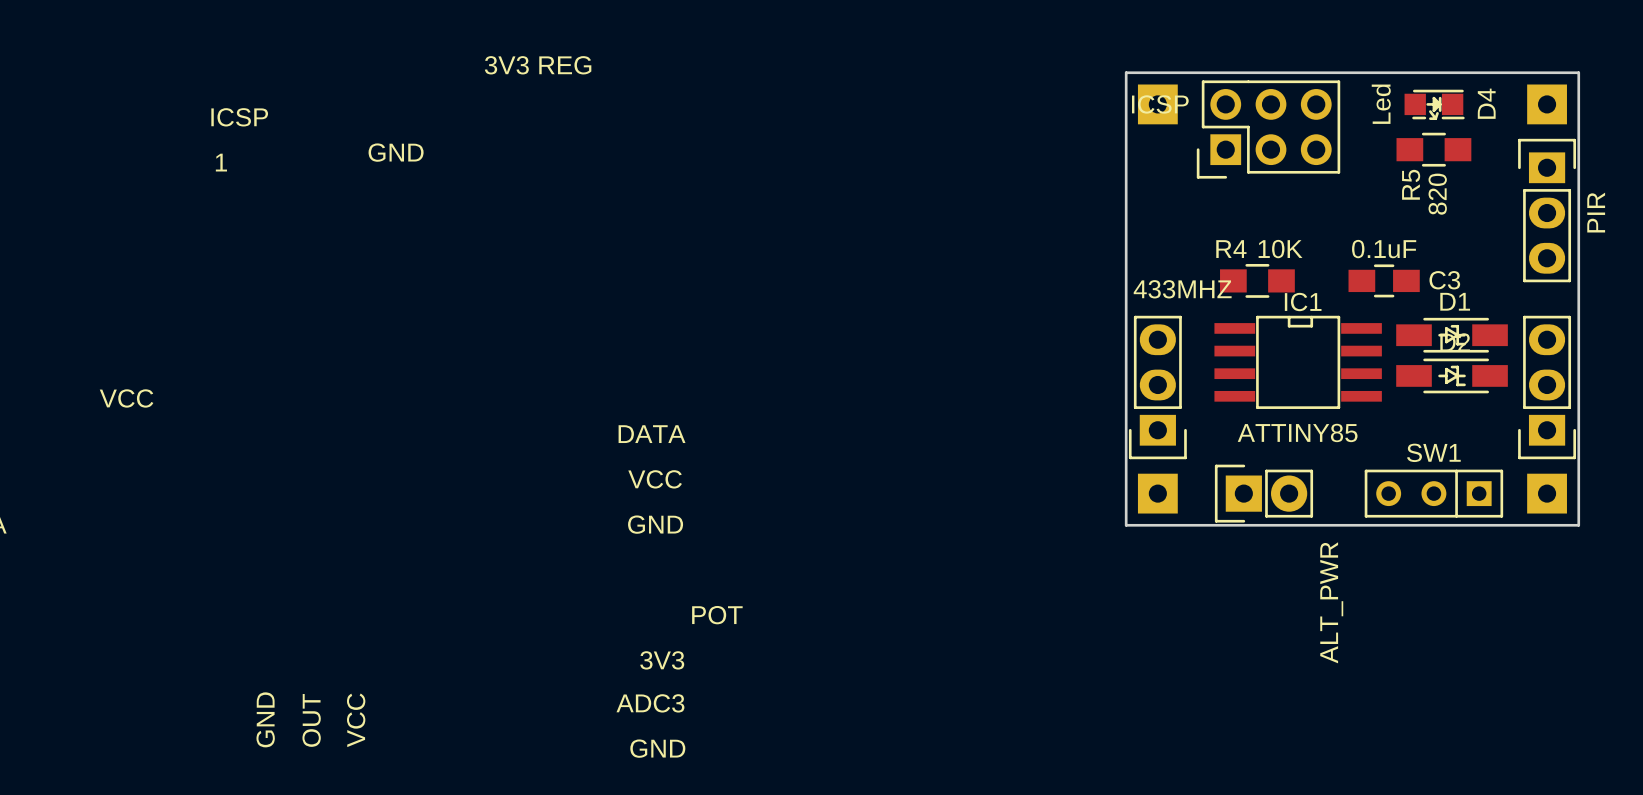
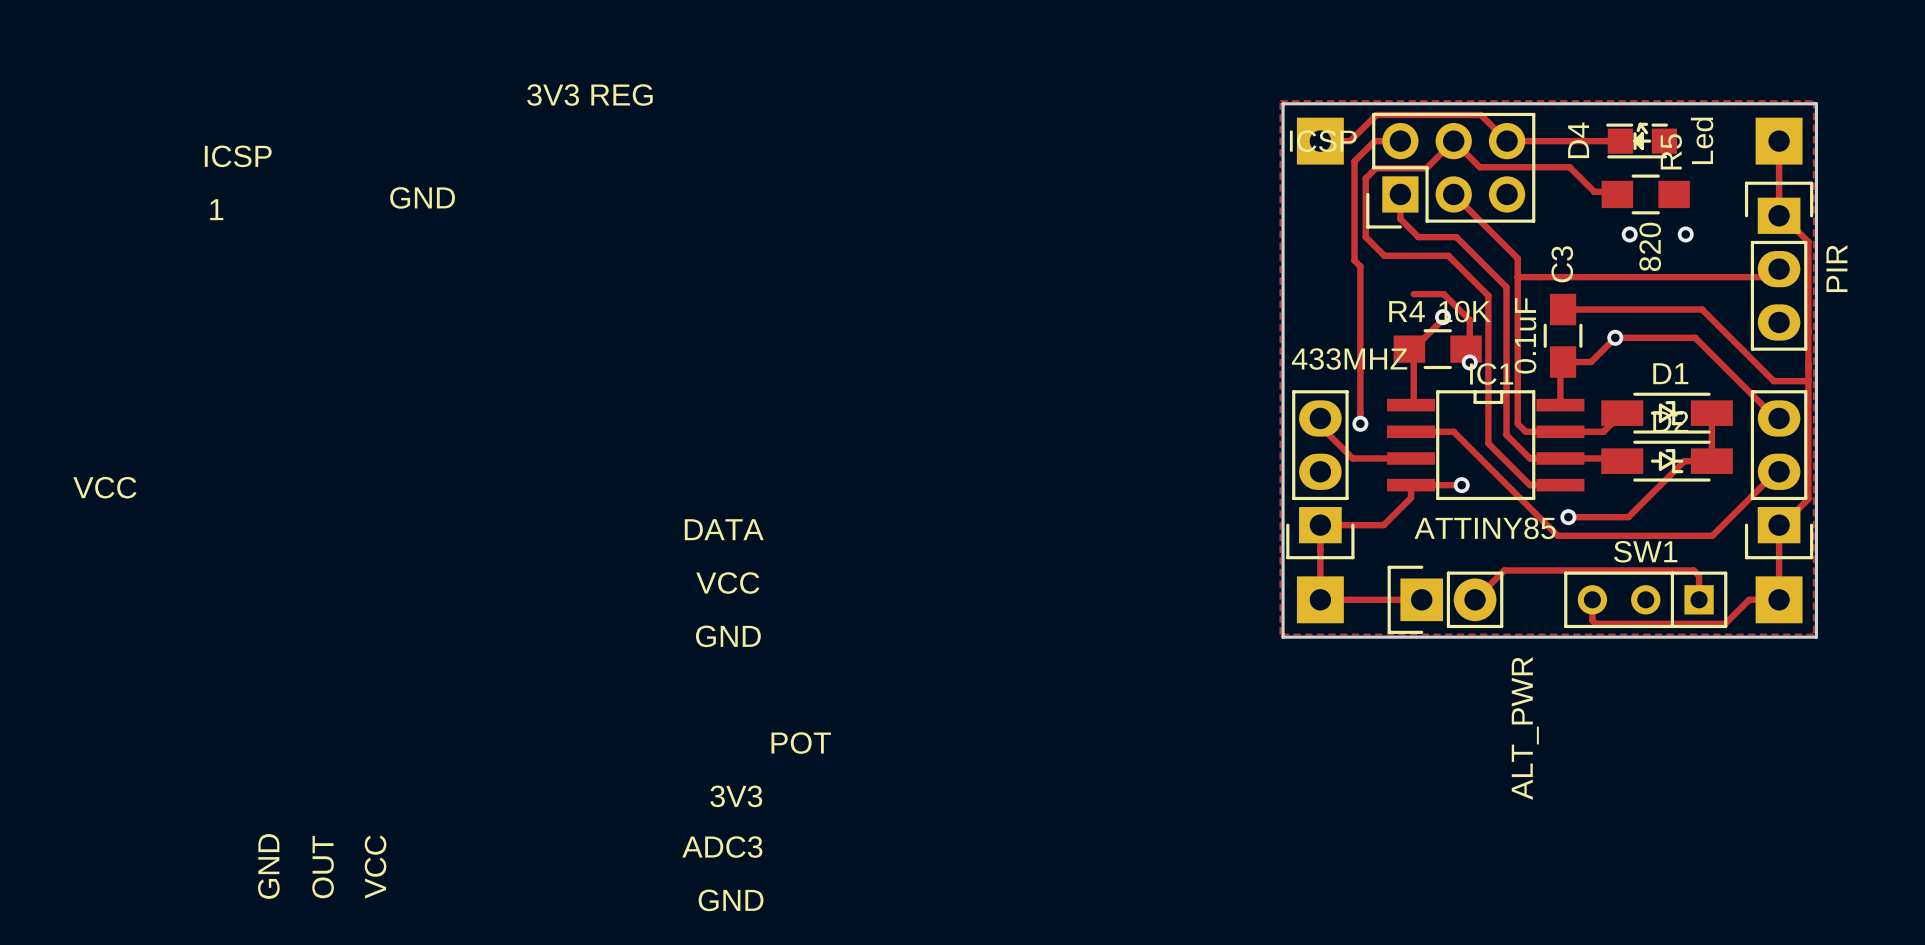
zone outline: none -> (1280, 101) (1280, 634) (1813, 634) (1813, 101) (1280, 101)
track: none -> (1320, 141) (1350, 141) (1376, 114) (1480, 114) (1507, 141) (1620, 141)
track: none -> (1400, 141) (1374, 141) (1354, 161) (1354, 260) (1360, 266) (1360, 423)
D4 rotation: 0° (1434, 104) -> 180° (1641, 140)
track: none -> (1779, 141) (1779, 215) (1782, 215) (1808, 241) (1808, 499) (1782, 525) (1779, 525) (1779, 599) (1749, 599) (1725, 623) (1595, 623) (1592, 620) (1592, 599)
track: none -> (1616, 191) (1594, 191) (1569, 167) (1479, 167) (1453, 141) (1426, 168) (1375, 168) (1365, 178) (1365, 237) (1384, 255) (1448, 255) (1488, 295) (1488, 443) (1530, 485) (1560, 485)
track: none -> (1413, 194) (1400, 194) (1400, 218) (1418, 237) (1456, 237) (1506, 287) (1506, 435) (1530, 458) (1619, 458) (1622, 461)
track: none -> (1453, 194) (1517, 258) (1517, 423) (1525, 431) (1603, 431) (1622, 413)
via: none -> (1629, 234)
via: none -> (1685, 234)
R5 name position: R5 (1411, 184) -> R5 (1671, 151)
track: none -> (1779, 269) (1771, 277) (1517, 277)
track: none -> (1413, 294) (1443, 294) (1469, 320) (1469, 362)
track: none -> (1563, 309) (1702, 309) (1773, 381) (1808, 381)
C3 value position: 0.1uF (1384, 249) -> 0.1uF (1525, 335)
track: none -> (1443, 317) (1443, 319) (1413, 348) (1413, 402) (1411, 405) (1413, 407)
via: none -> (1443, 317)
via: none -> (1615, 337)
C3 rotation: 0° (1384, 280) -> 90° clockwise (1563, 335)
C3 name position: C3 (1444, 280) -> C3 (1562, 264)
via: none -> (1469, 362)
track: none -> (1560, 405) (1560, 364) (1563, 362) (1591, 362) (1615, 337) (1695, 337) (1775, 418) (1779, 418)
track: none -> (1711, 413) (1711, 461) (1684, 461) (1628, 517) (1568, 517)
track: none -> (1320, 418) (1320, 426) (1352, 458) (1411, 458)
via: none -> (1360, 423)
track: none -> (1411, 431) (1453, 431) (1557, 535) (1712, 535) (1776, 471) (1779, 471)
track: none -> (1461, 485) (1411, 485) (1411, 497) (1383, 525) (1320, 525) (1320, 599) (1421, 599)
via: none -> (1461, 485)
via: none -> (1568, 517)
track: none -> (1475, 599) (1504, 570) (1693, 570) (1699, 575) (1699, 599)

